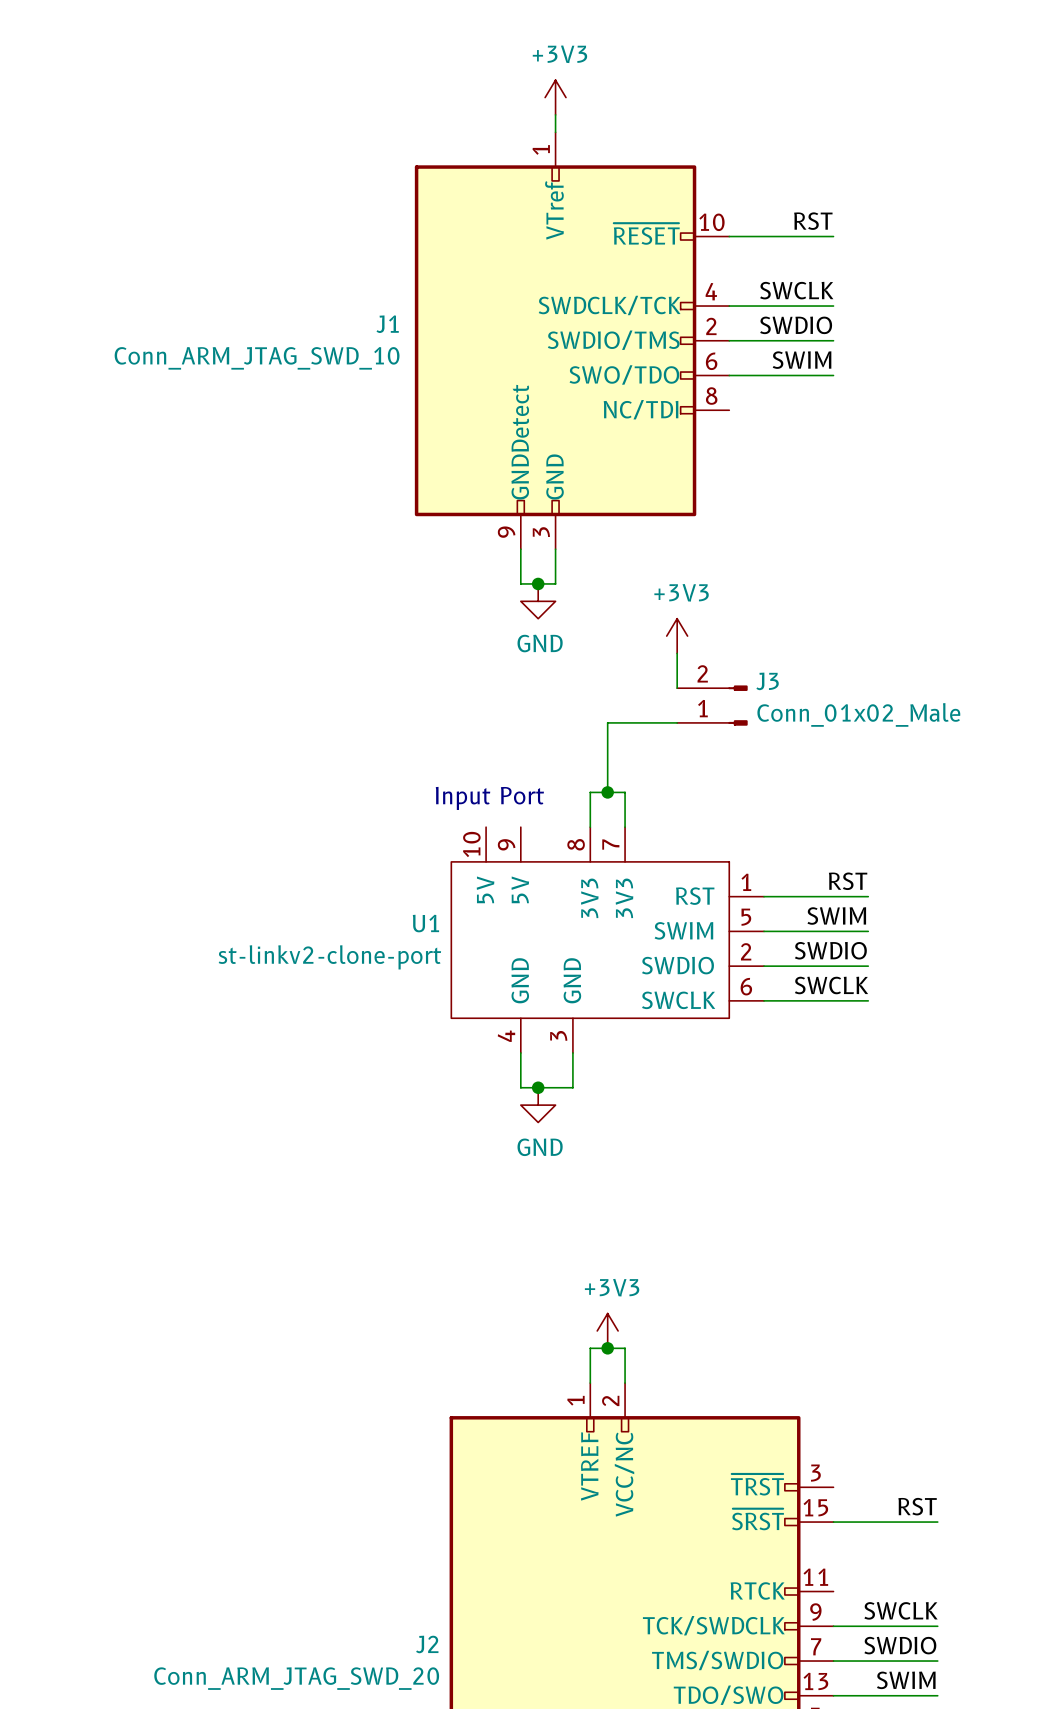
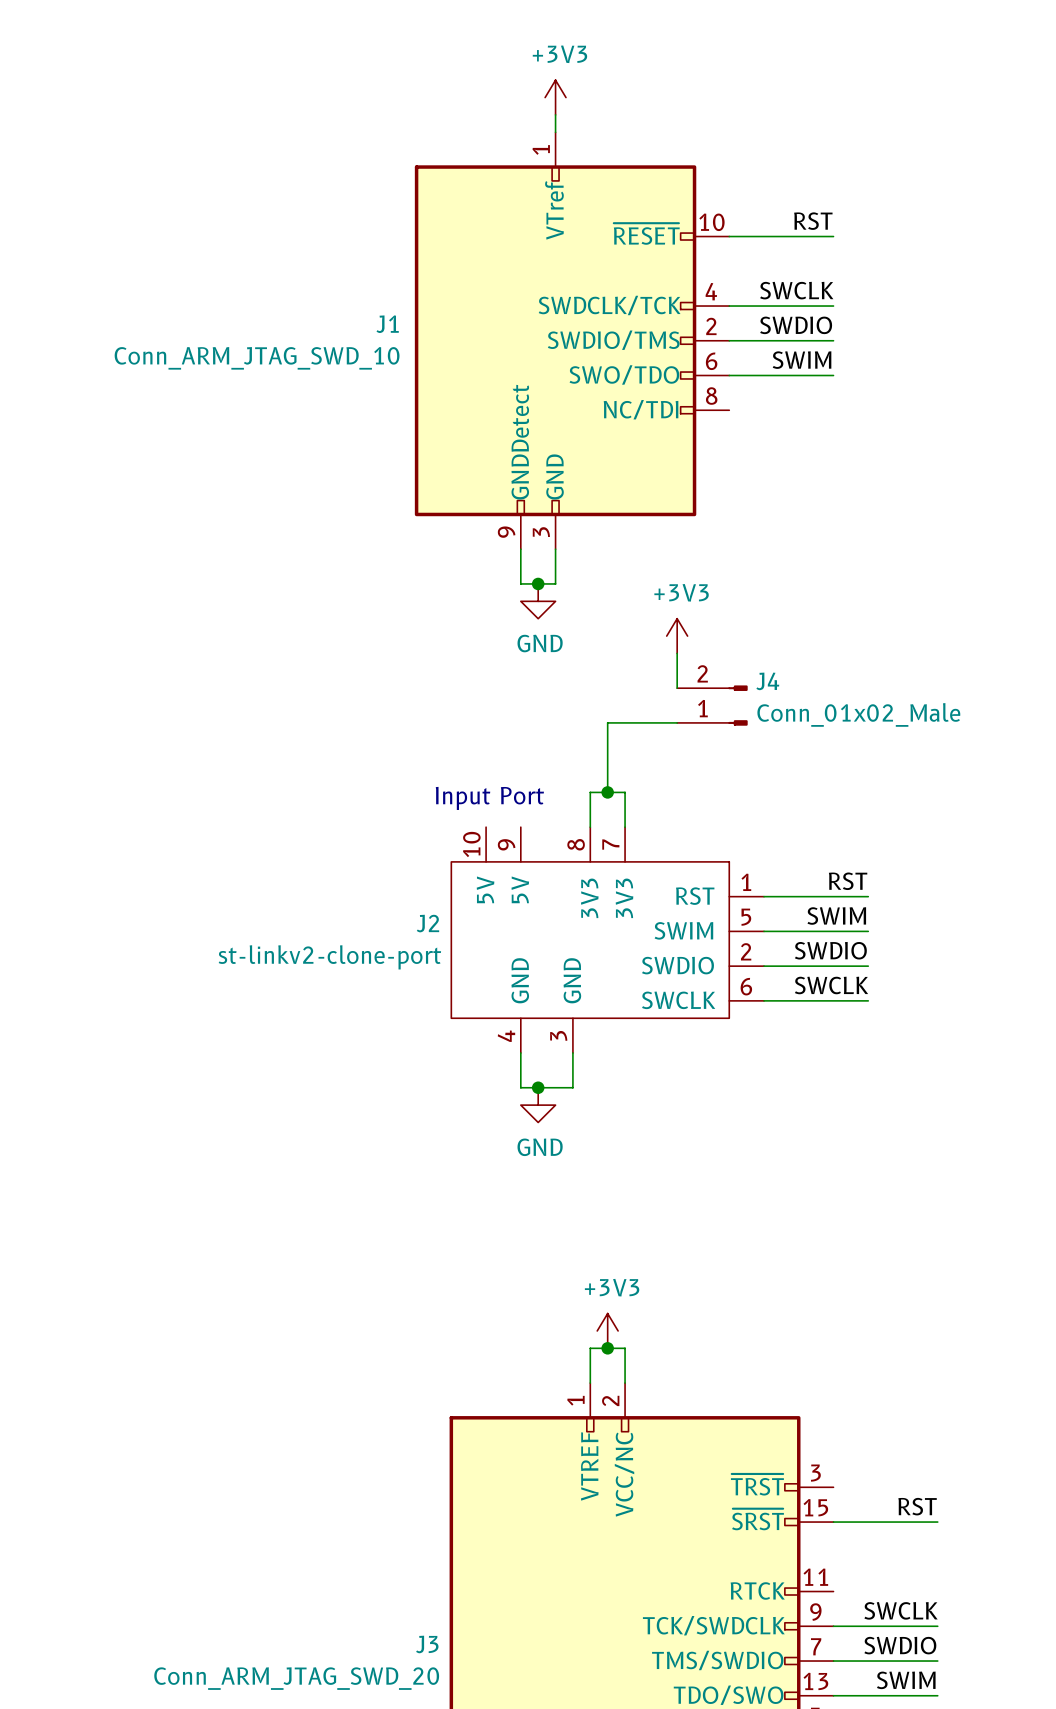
J3 name: J3 (767, 681) -> J4 (767, 681)
U1 name: U1 (425, 923) -> J2 (427, 923)
J2 name: J2 (427, 1644) -> J3 (427, 1644)

